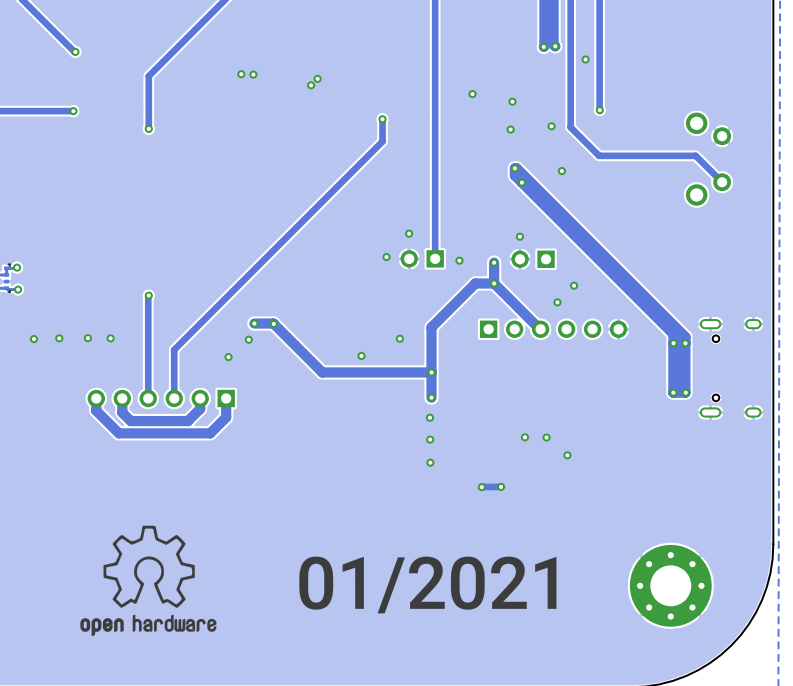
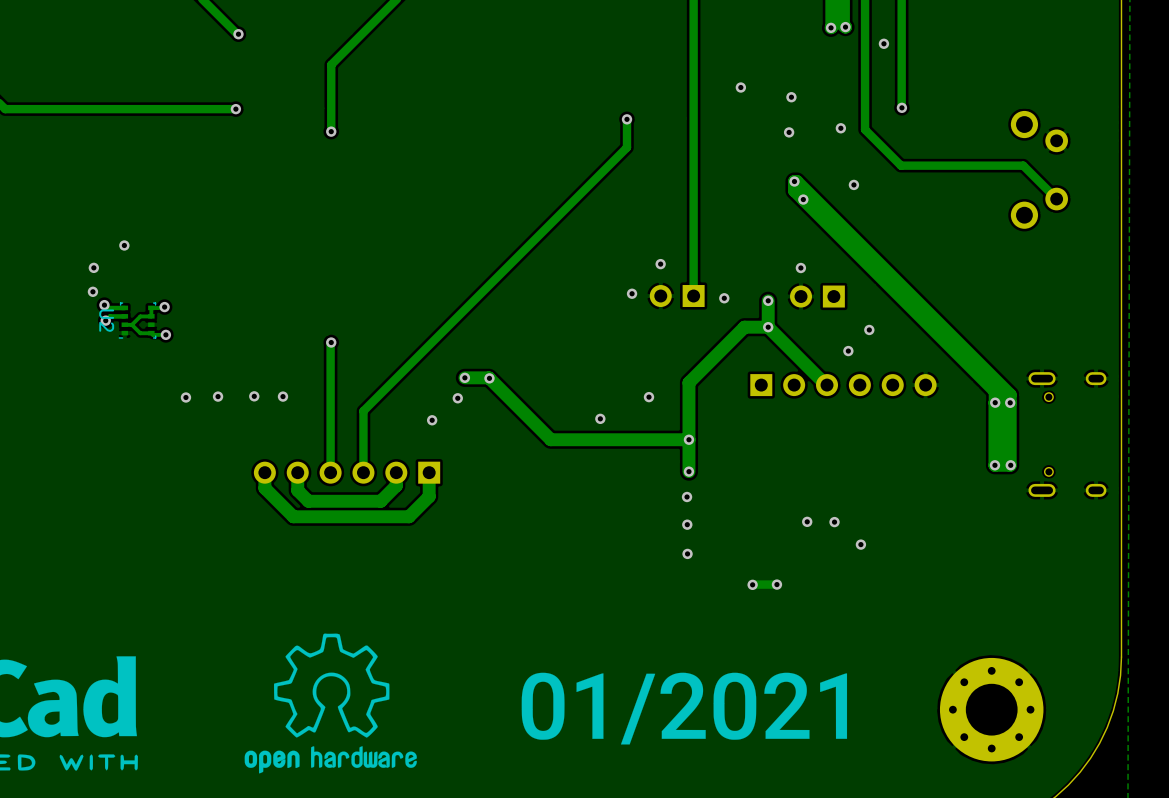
via: (241, 74) -> none
via: (253, 74) -> none
via: (317, 78) -> none
via: (311, 85) -> none

